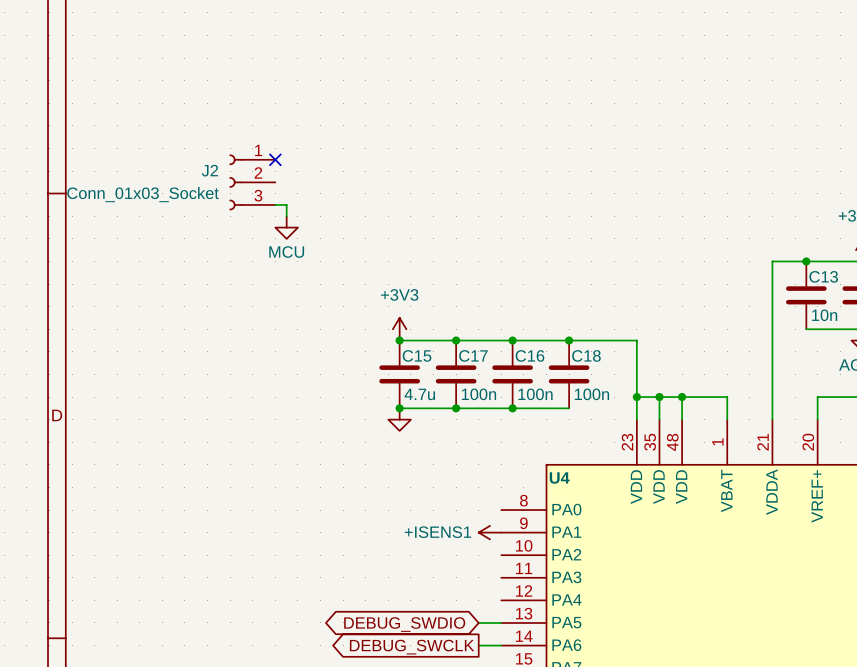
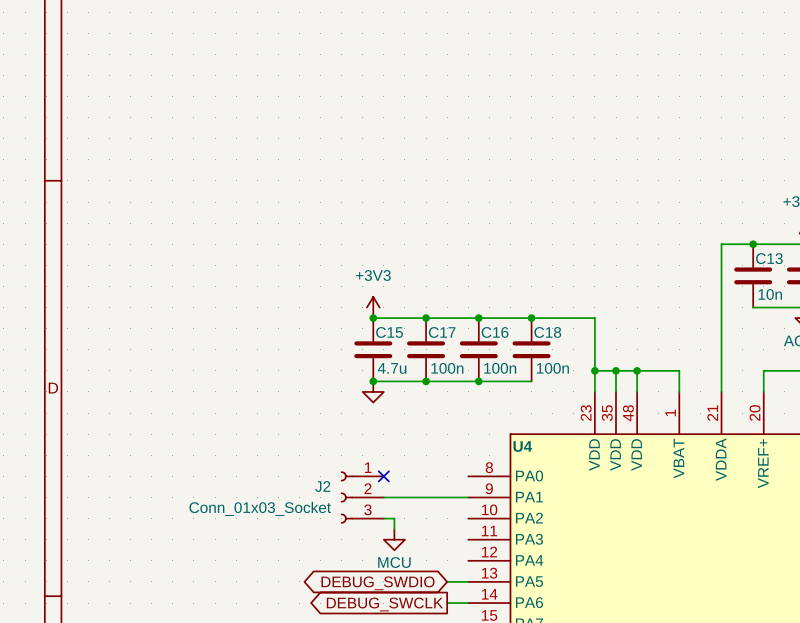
no-connect mark: (275, 159) -> none
J2 position: (252, 182) -> (362, 497)
wire: (275, 204) (286, 204) (286, 216) -> none
power symbol: MCU (286, 227) -> none
no-connect mark: none -> (383, 476)
wire: none -> (383, 497) (468, 497)
power symbol: +ISENS1 (490, 532) -> none
wire: none -> (383, 518) (394, 518) (394, 529)
power symbol: none -> MCU (394, 539)

